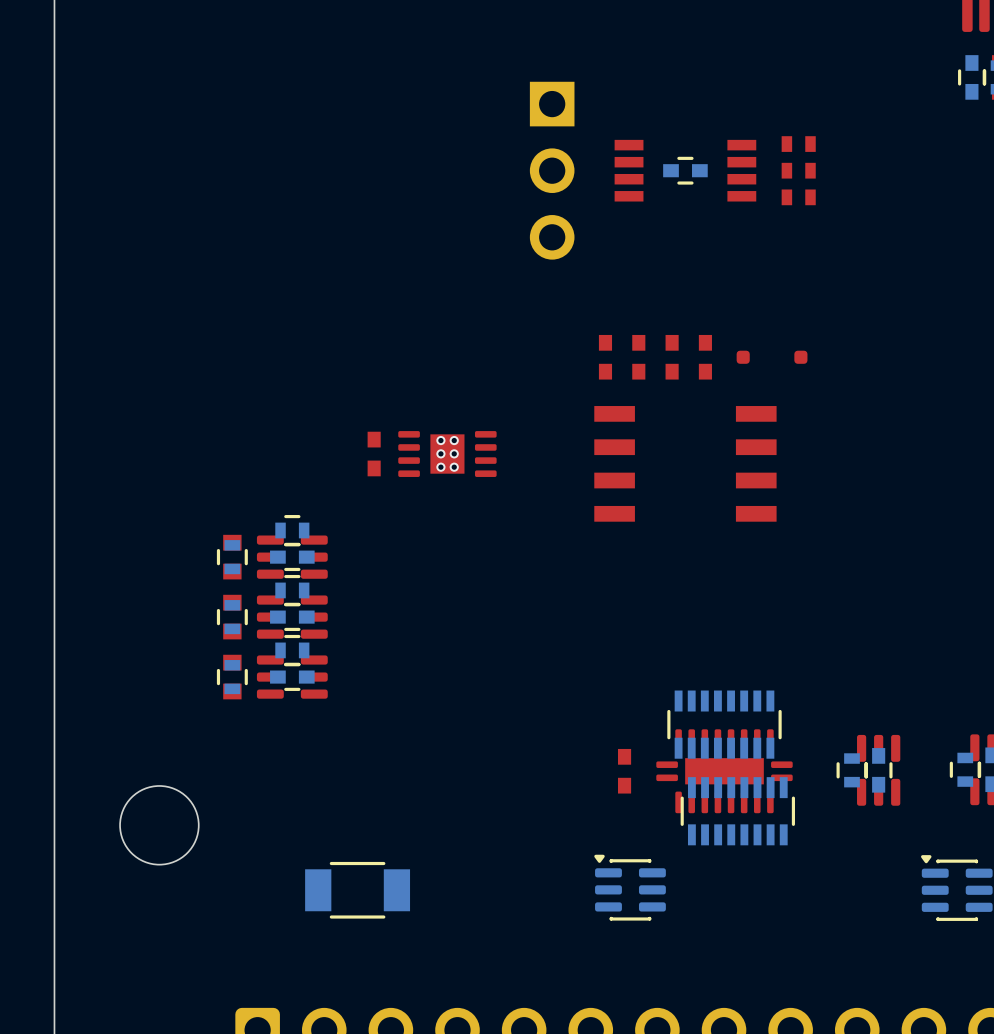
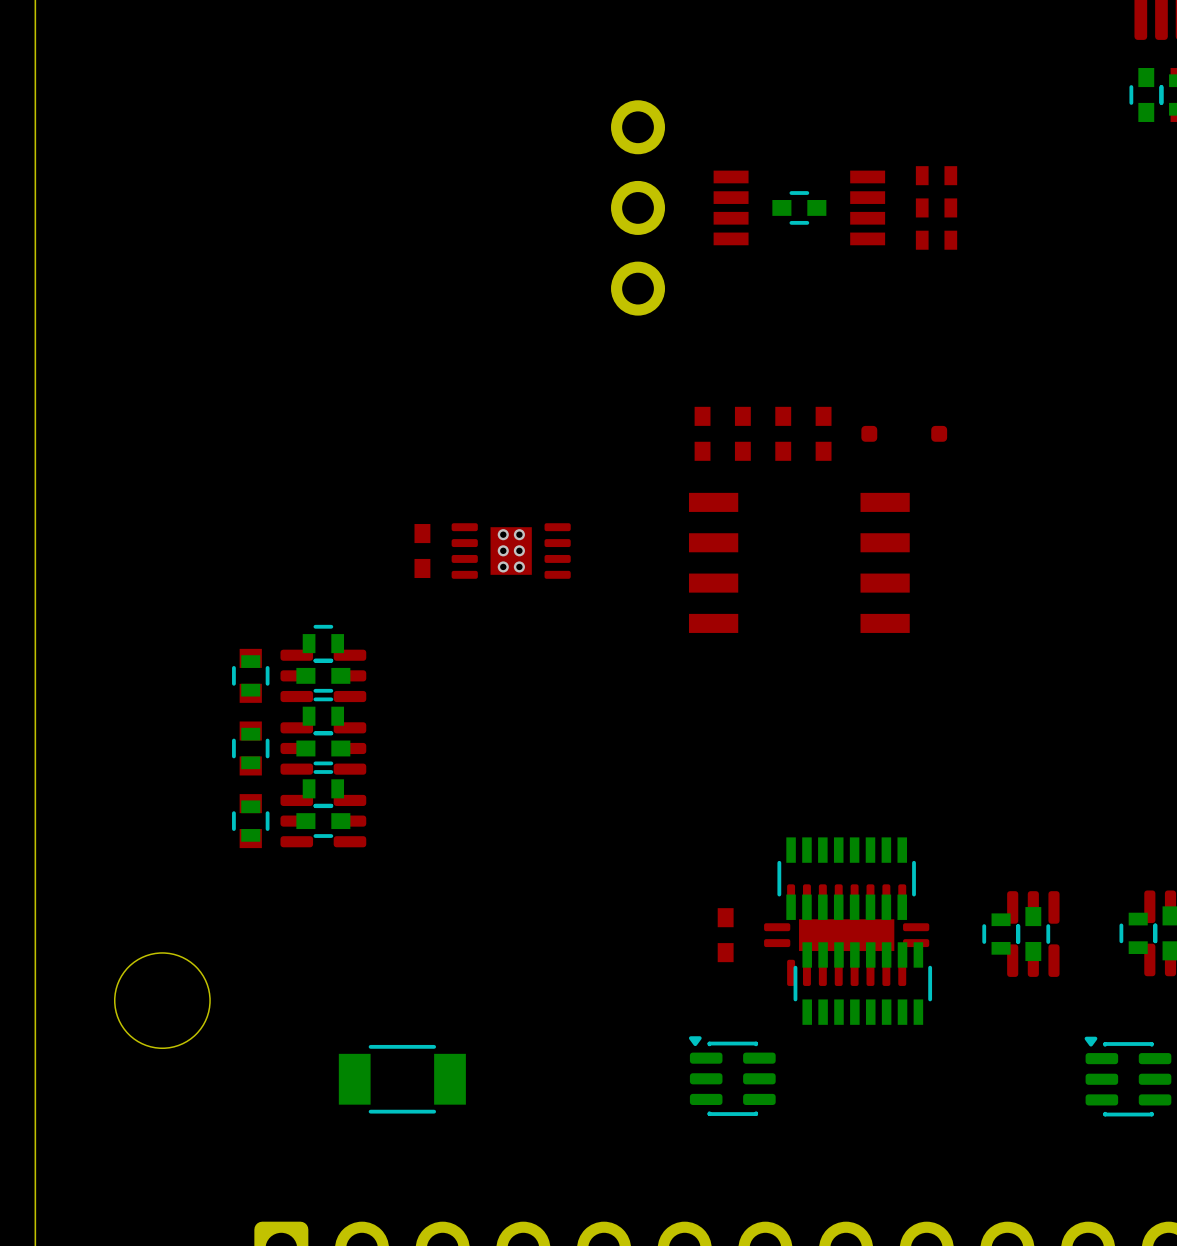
part footprint: [529, 81, 575, 260] -> [611, 100, 666, 316]

